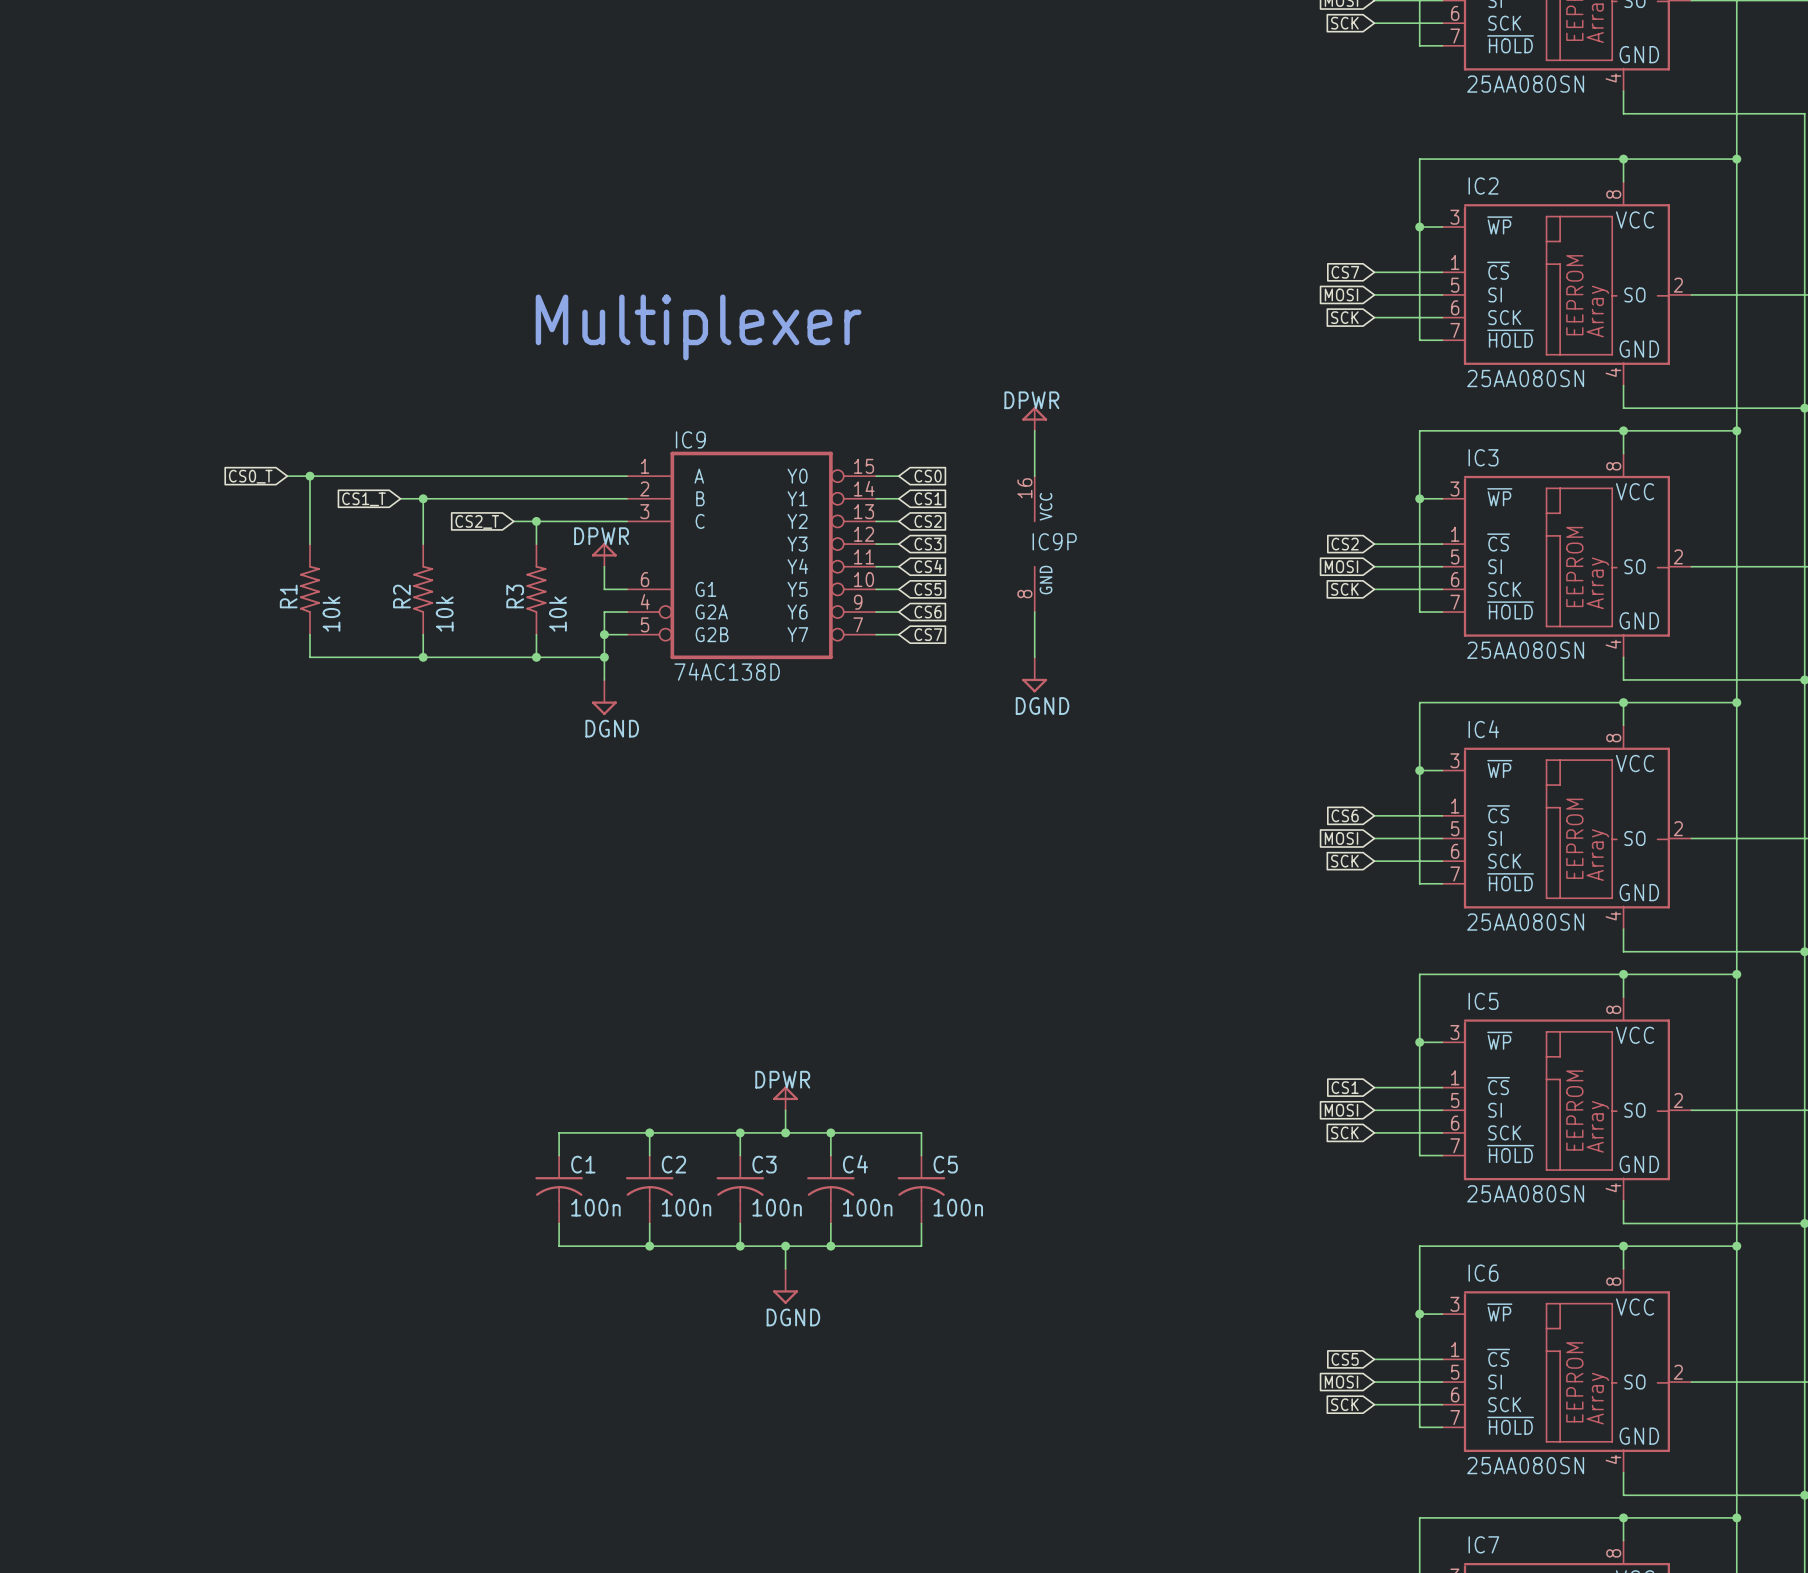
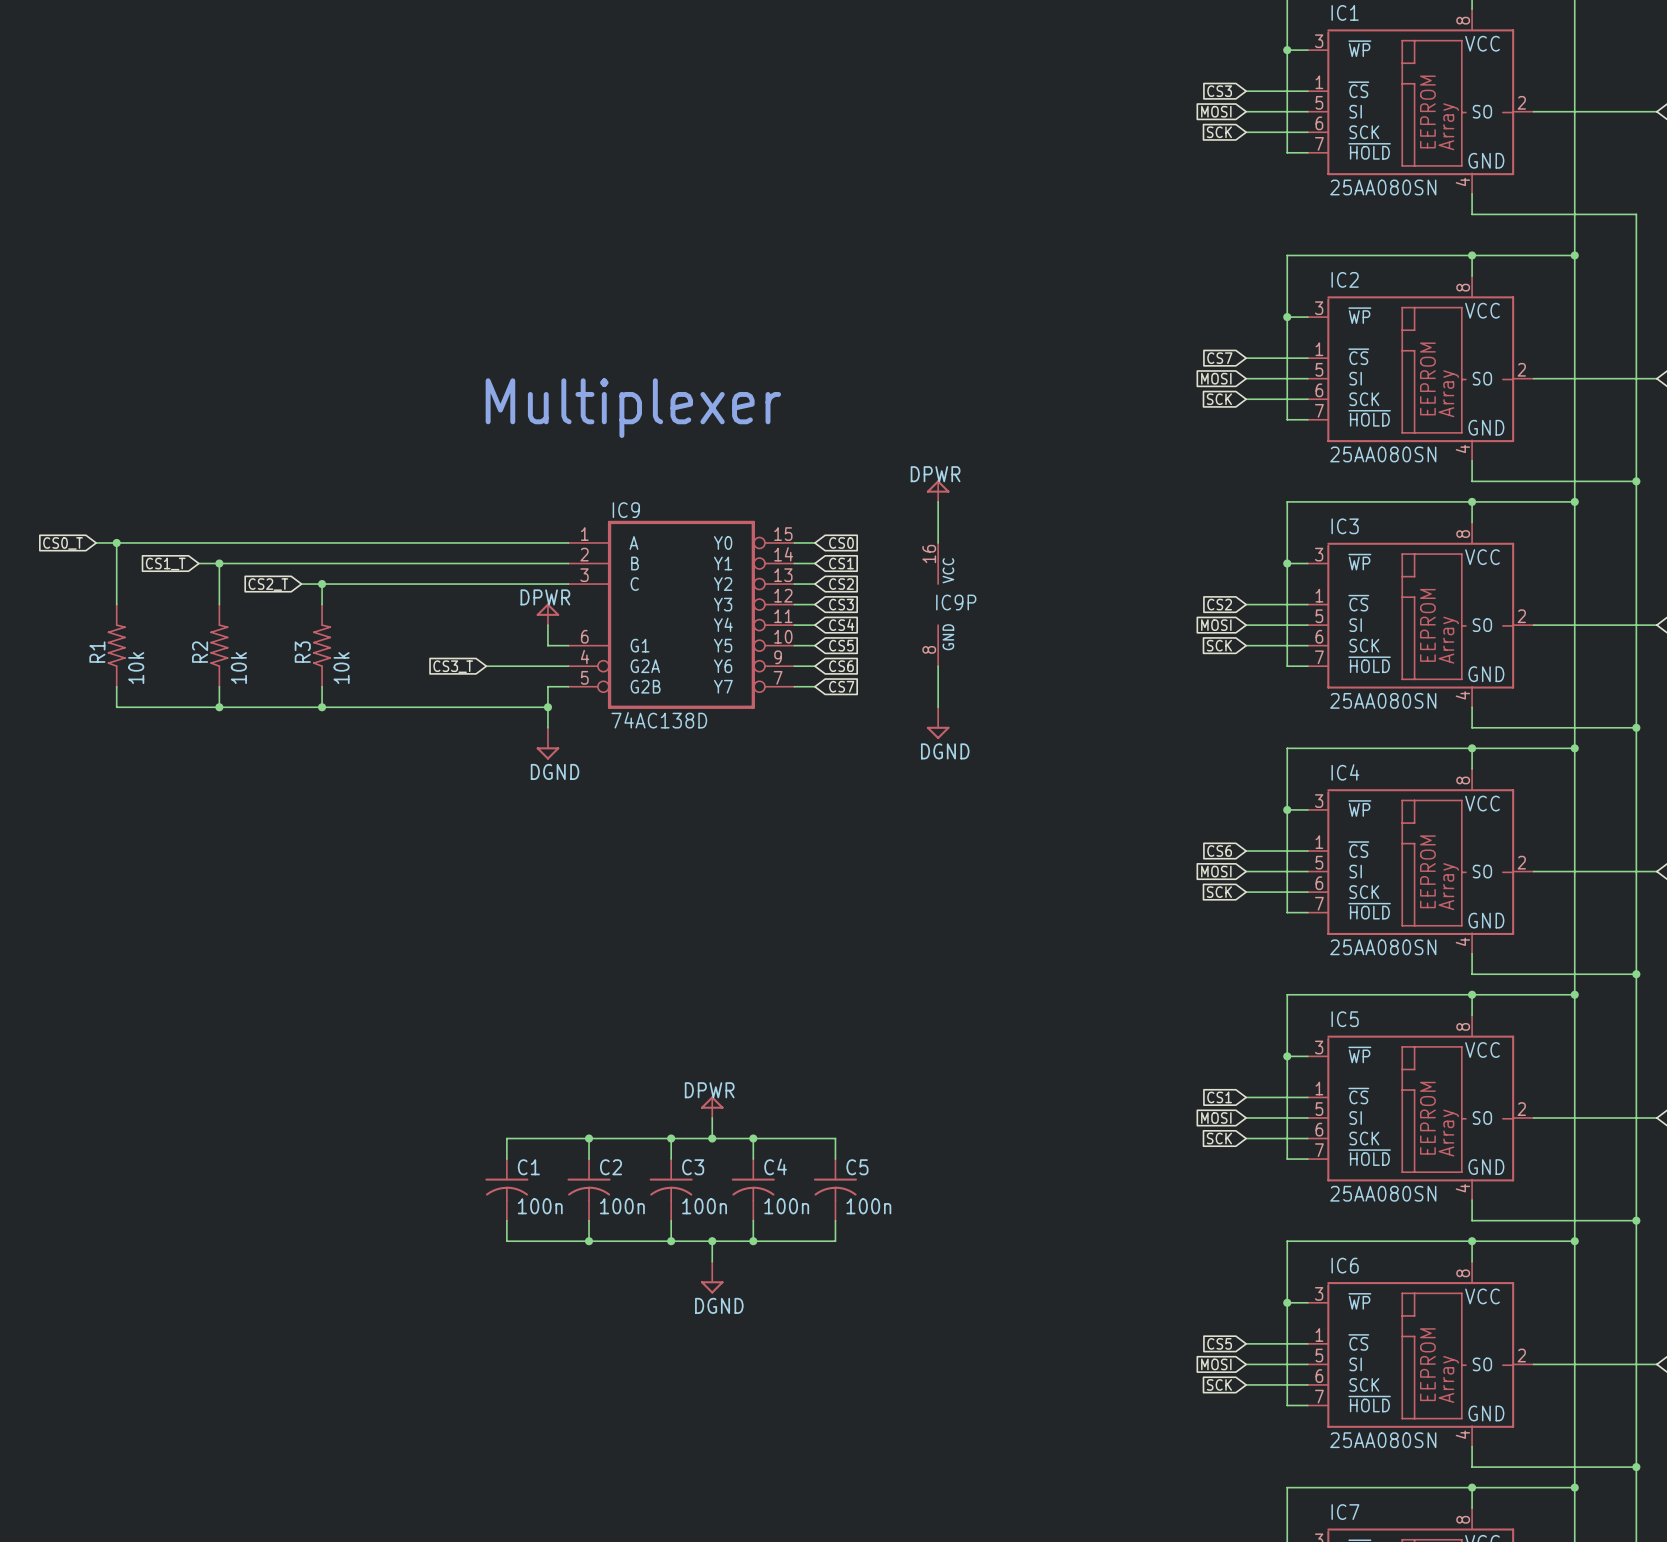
wire: none -> (96, 542) (260, 542)
junction: none -> (116, 542)
global label position: CS0_T (250, 476) -> CS0_T (63, 543)
wire: (309, 476) (309, 544) -> (116, 542) (116, 604)
junction: (309, 476) -> none
wire: none -> (198, 563) (363, 563)
junction: none -> (219, 563)
wire: (423, 498) (423, 544) -> (219, 563) (219, 604)
junction: (423, 498) -> none
global label position: CS1_T (364, 499) -> CS1_T (165, 564)
wire: none -> (301, 584) (465, 584)
junction: none -> (322, 584)
global label position: CS2_T (477, 521) -> CS2_T (268, 584)
wire: (536, 521) (536, 544) -> (322, 584) (322, 604)
junction: (536, 521) -> none
R1 position: (309, 589) -> (116, 645)
R2 position: (423, 589) -> (219, 645)
R3 position: (536, 589) -> (322, 645)
global label: none -> CS3_T (453, 666)
wire: (604, 612) (604, 634) -> (547, 666) (486, 666)
wire: (309, 634) (309, 657) -> (116, 686) (116, 707) (280, 707)
wire: (423, 634) (423, 657) -> (219, 686) (219, 707)
wire: (536, 634) (536, 657) -> (322, 686) (322, 707)
junction: (604, 634) -> none
junction: none -> (219, 707)
junction: none -> (322, 707)
junction: (423, 657) -> none
junction: (536, 657) -> none

